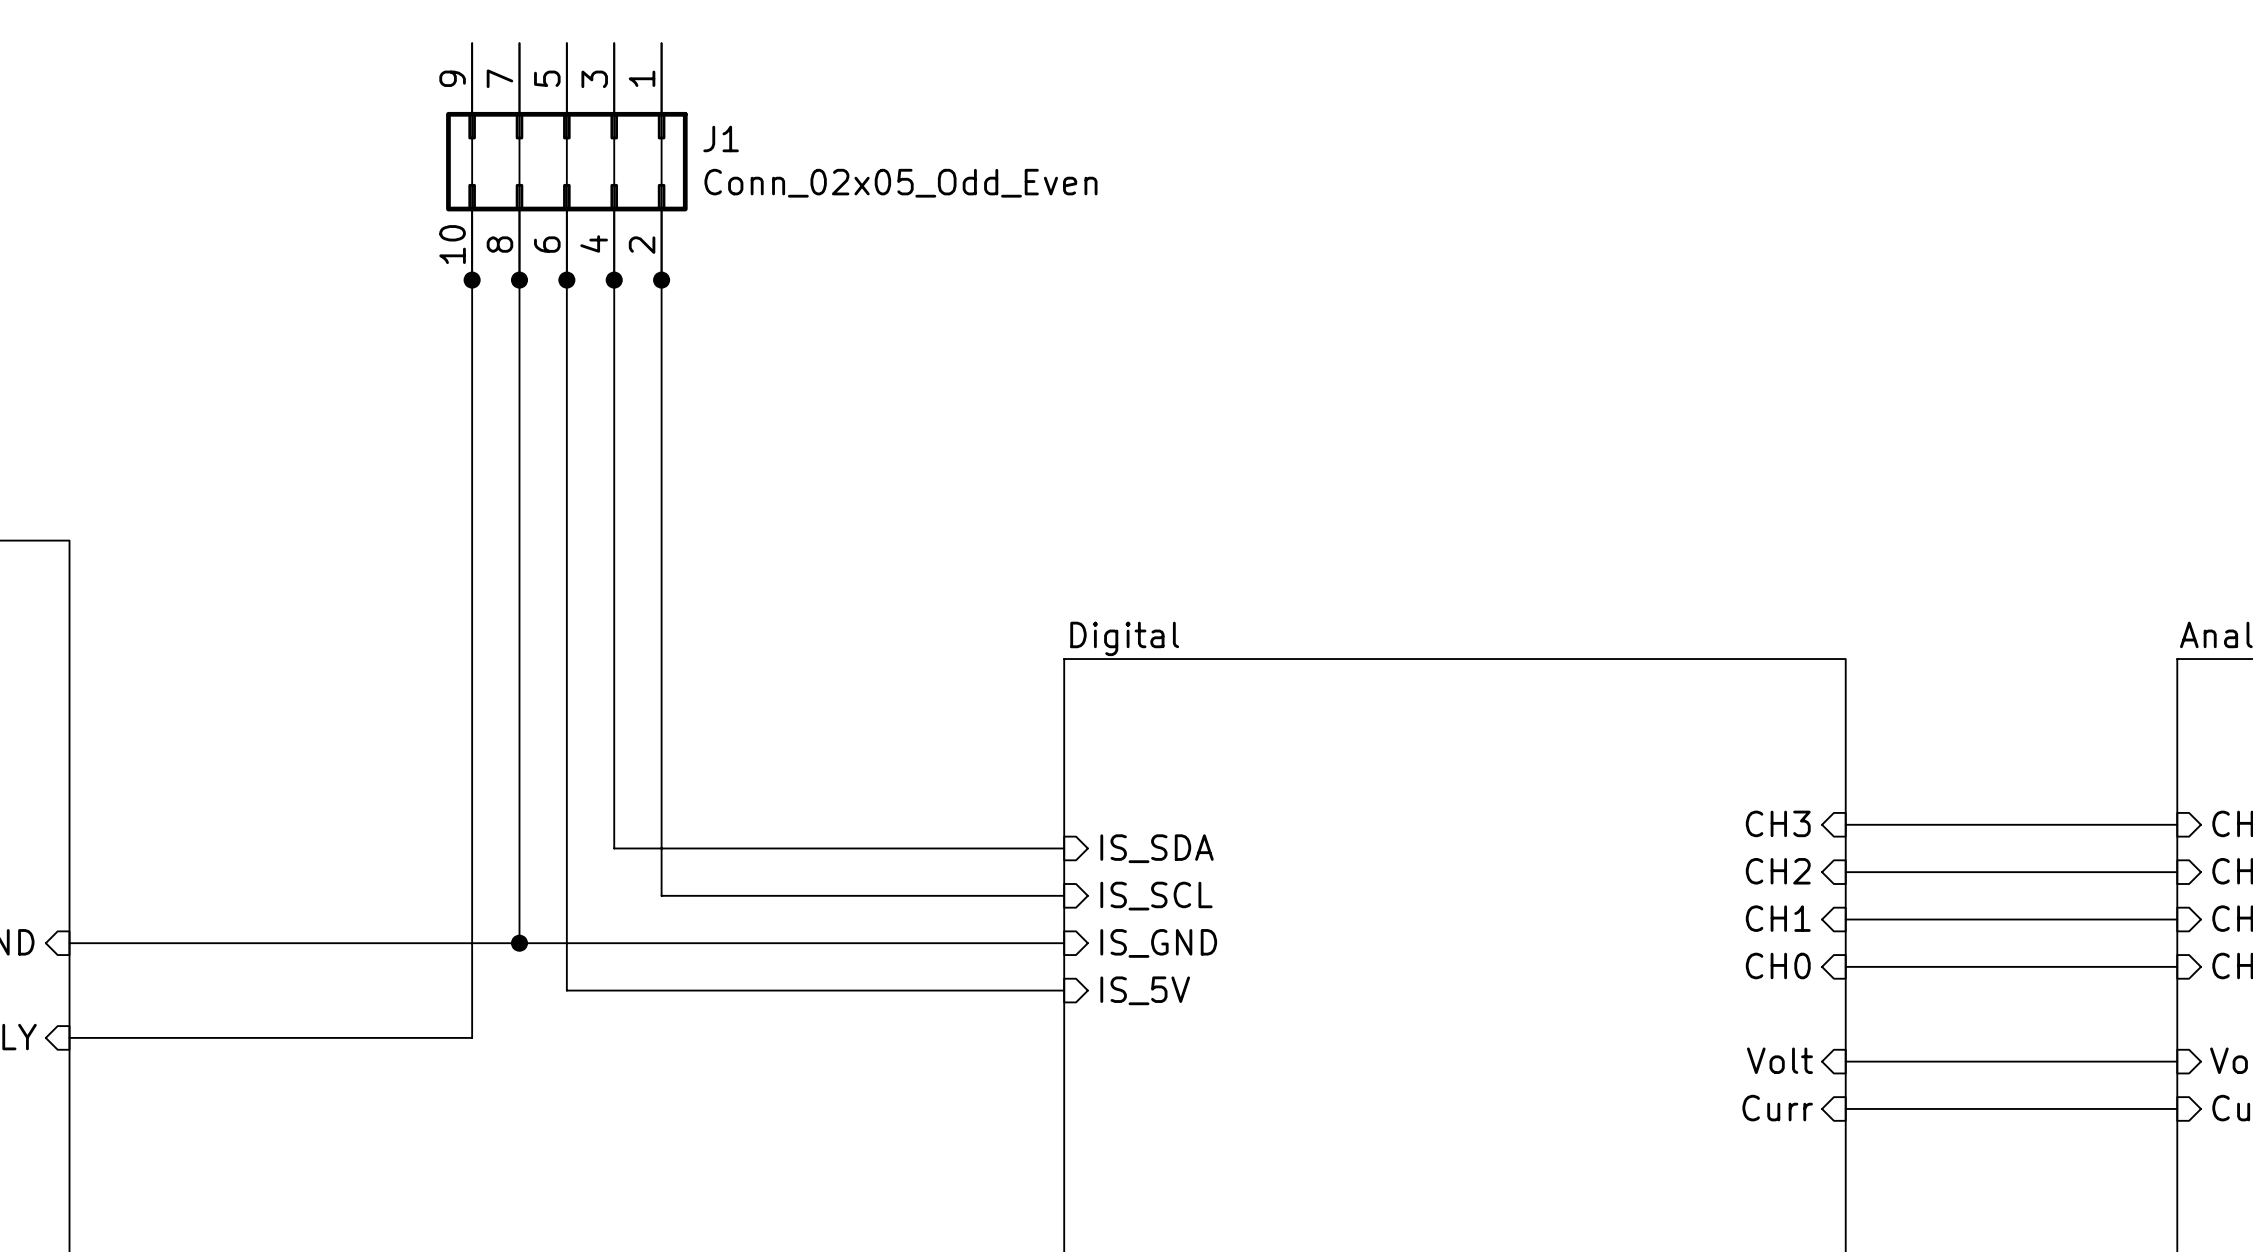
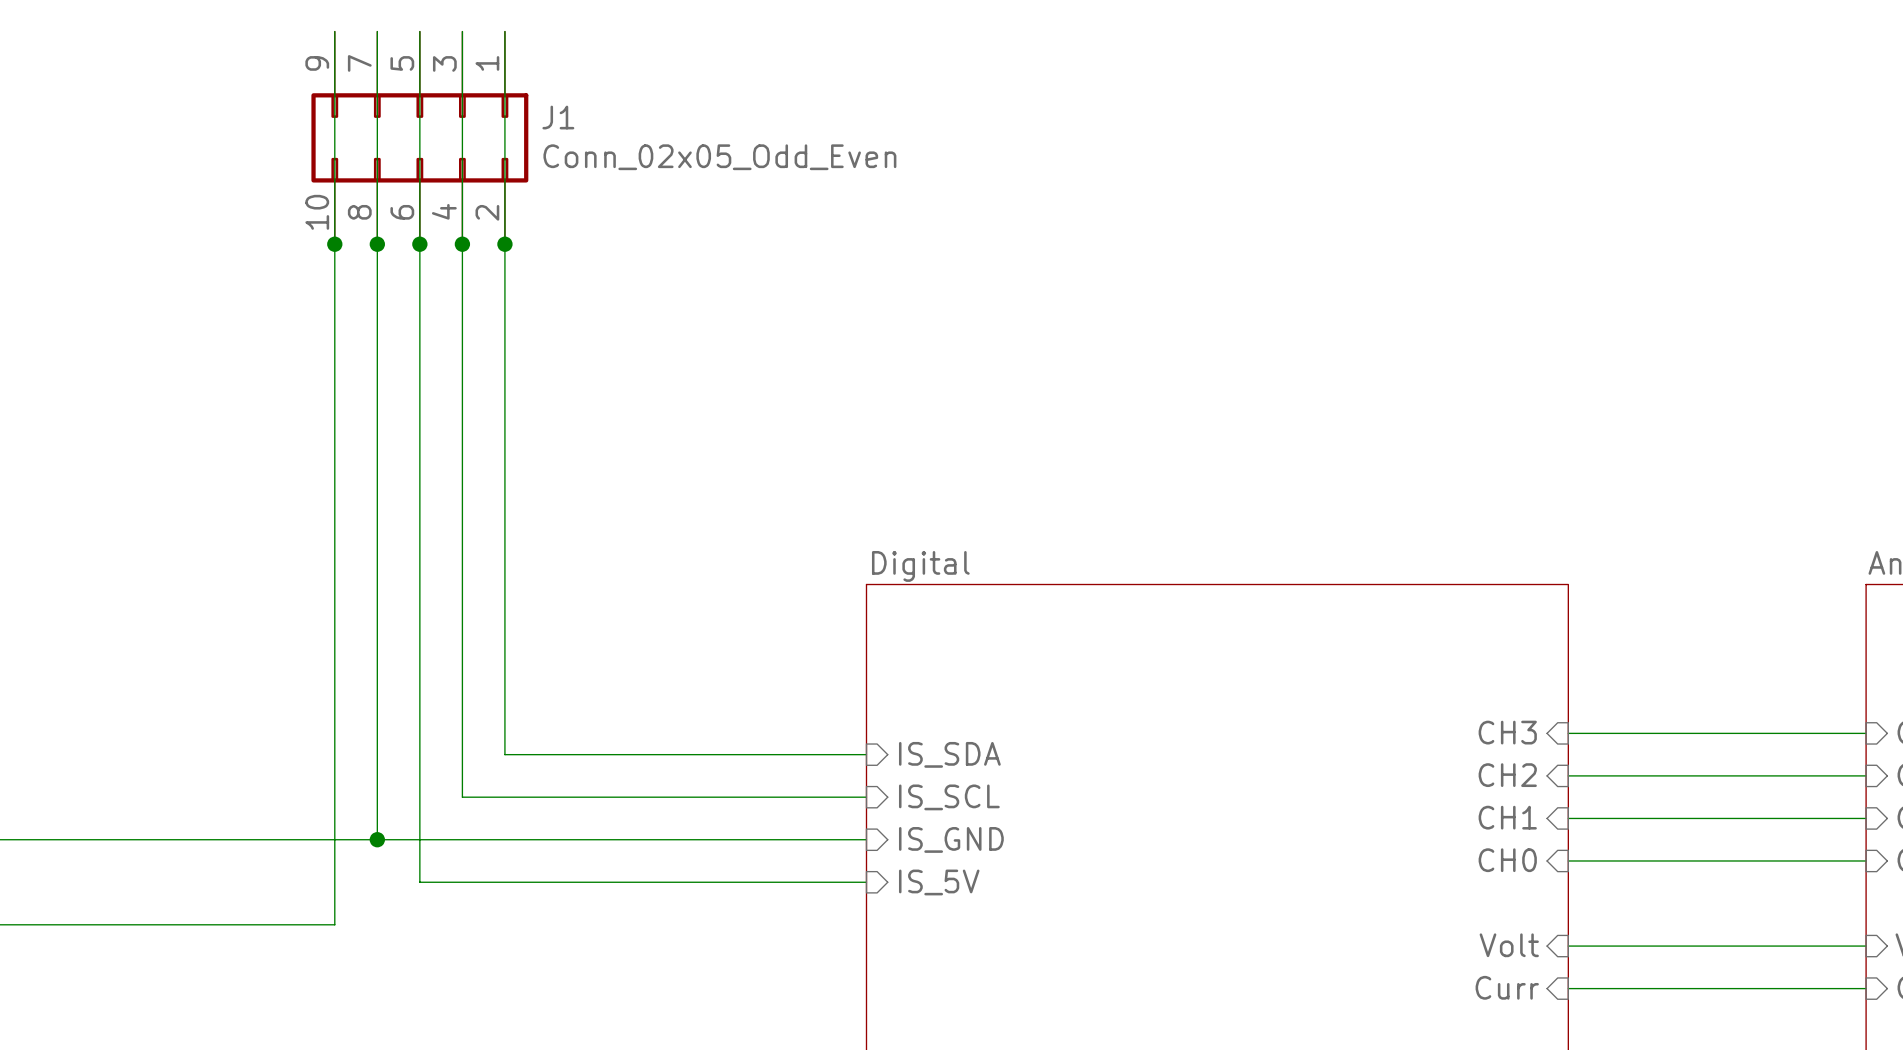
wire: (614, 848) (661, 848) (661, 895) -> (462, 754) (462, 797) (504, 797)

